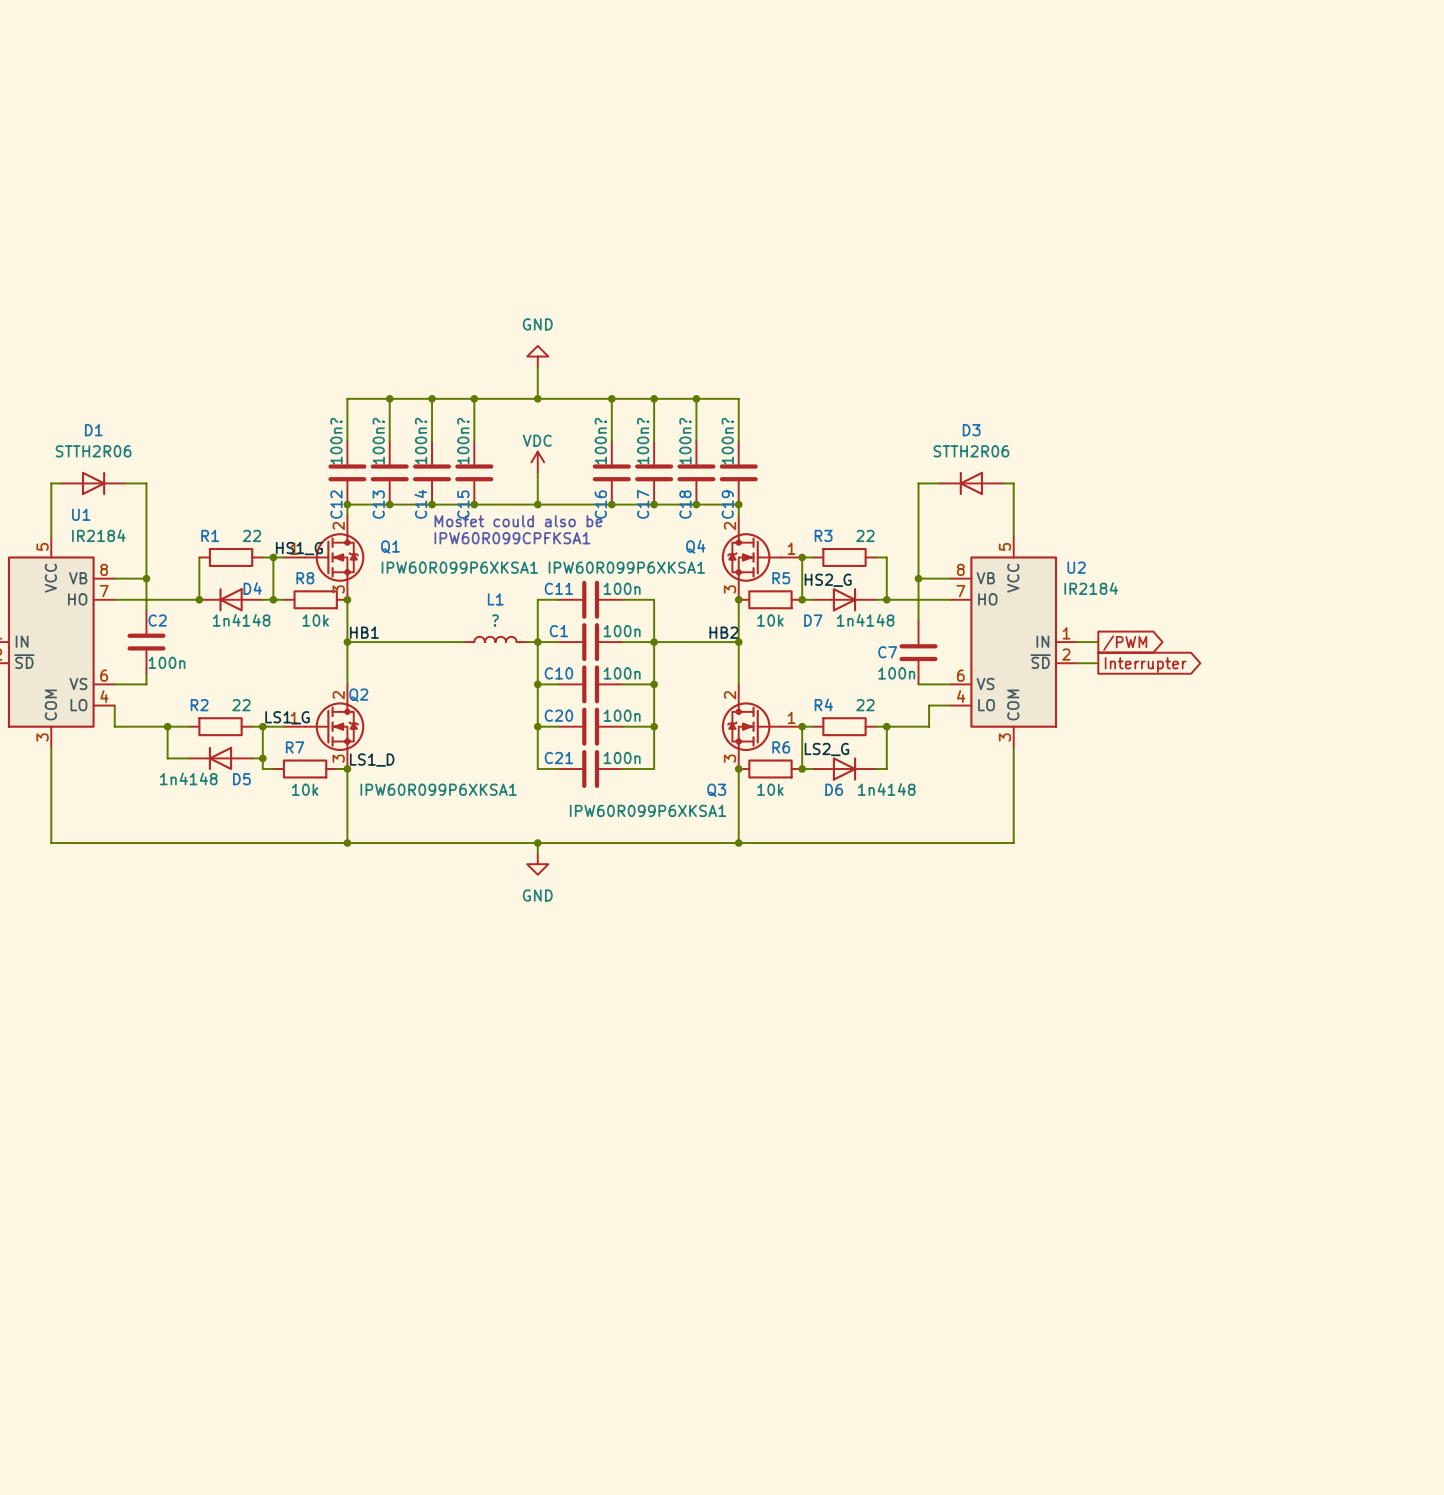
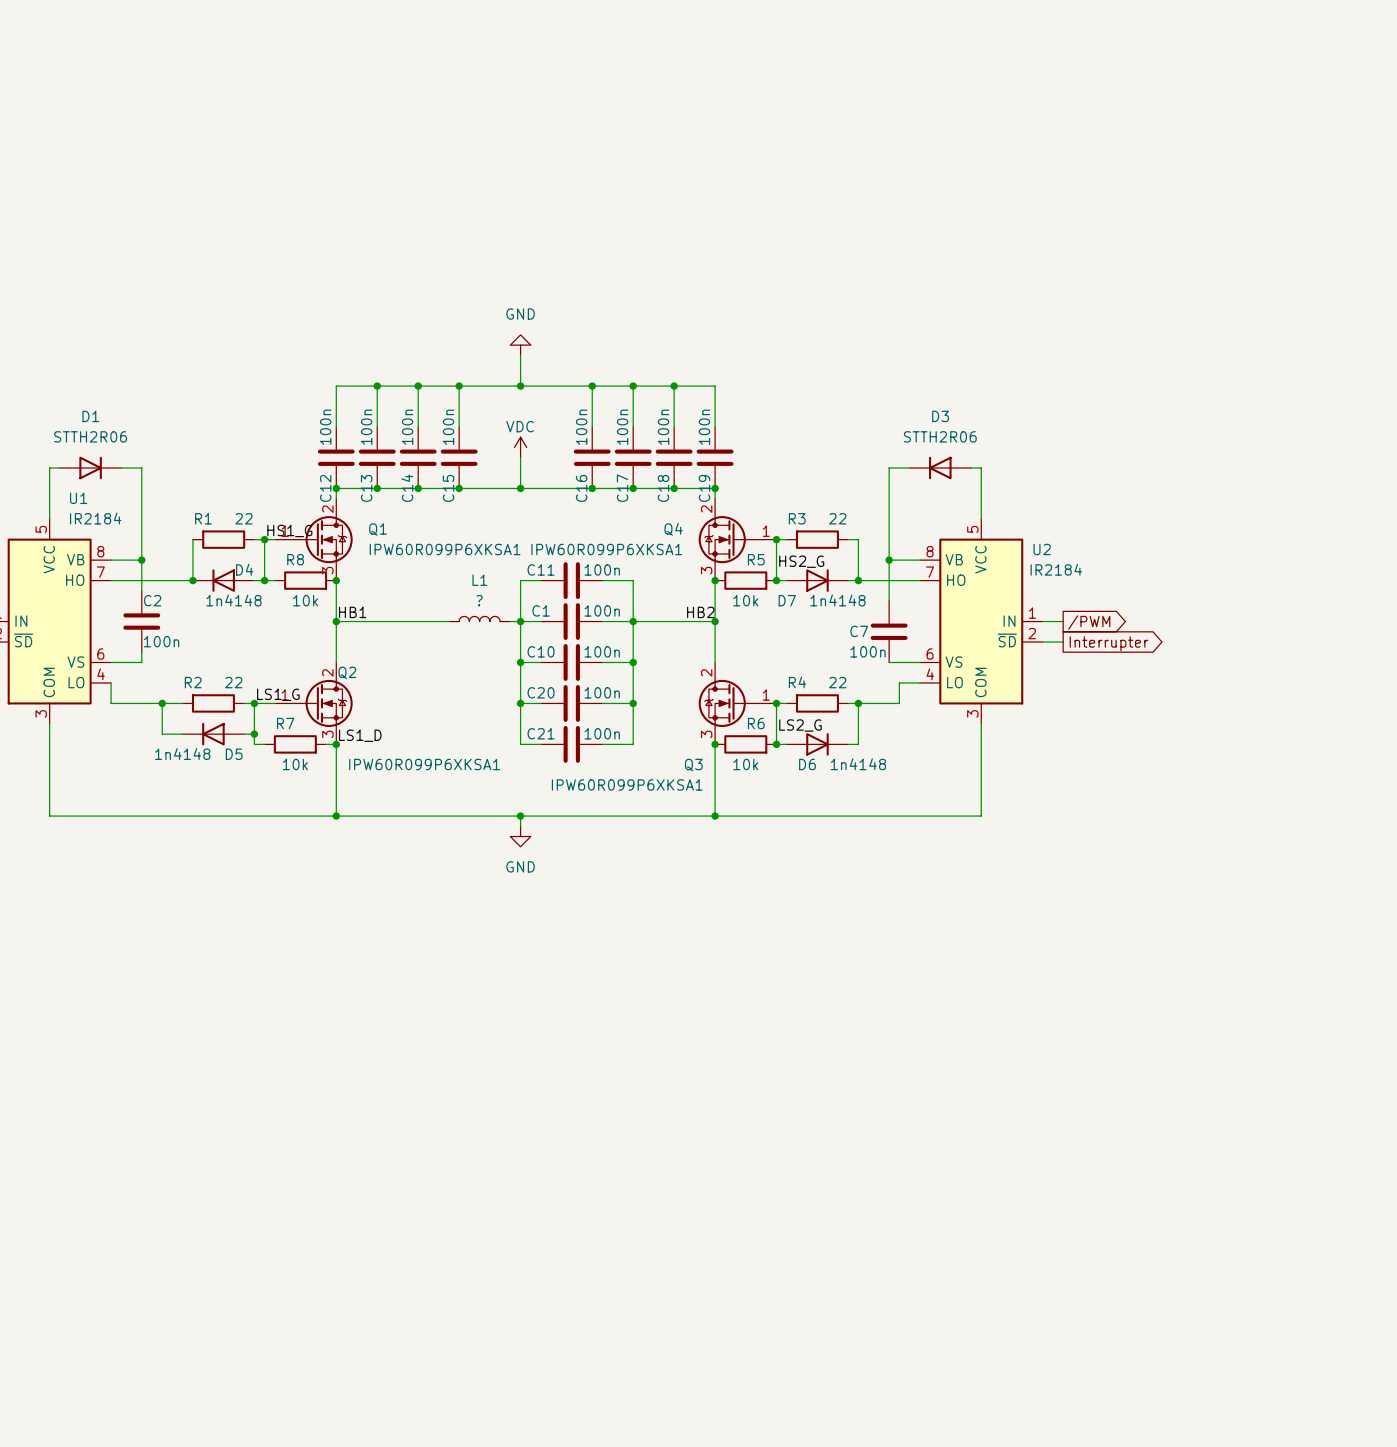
C12 value: 100n? (336, 441) -> 100n (325, 427)
C13 value: 100n? (378, 441) -> 100n (366, 427)
C14 value: 100n? (421, 441) -> 100n (407, 427)
C15 value: 100n? (463, 441) -> 100n (448, 427)
C16 value: 100n? (600, 441) -> 100n (581, 427)
C17 value: 100n? (643, 441) -> 100n (622, 427)
C18 value: 100n? (685, 441) -> 100n (663, 427)
C19 value: 100n? (727, 441) -> 100n (704, 427)
text: Mosfet could also be (518, 521) -> none
text: IPW60R099CPFKSA1 (512, 538) -> none

